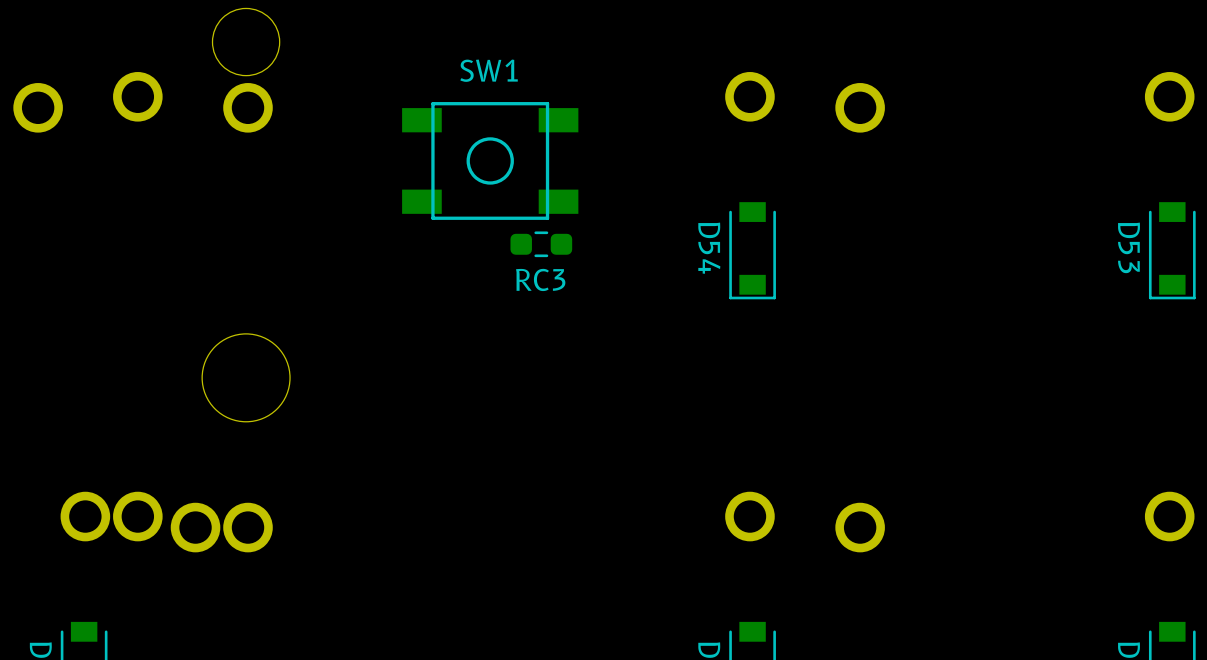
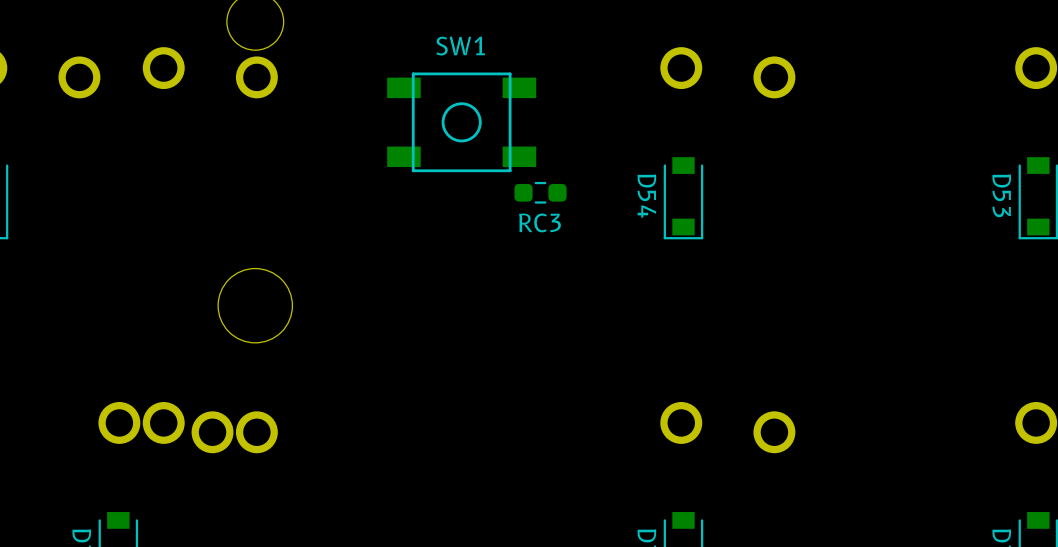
RC3 position: (541, 244) -> (540, 192)

